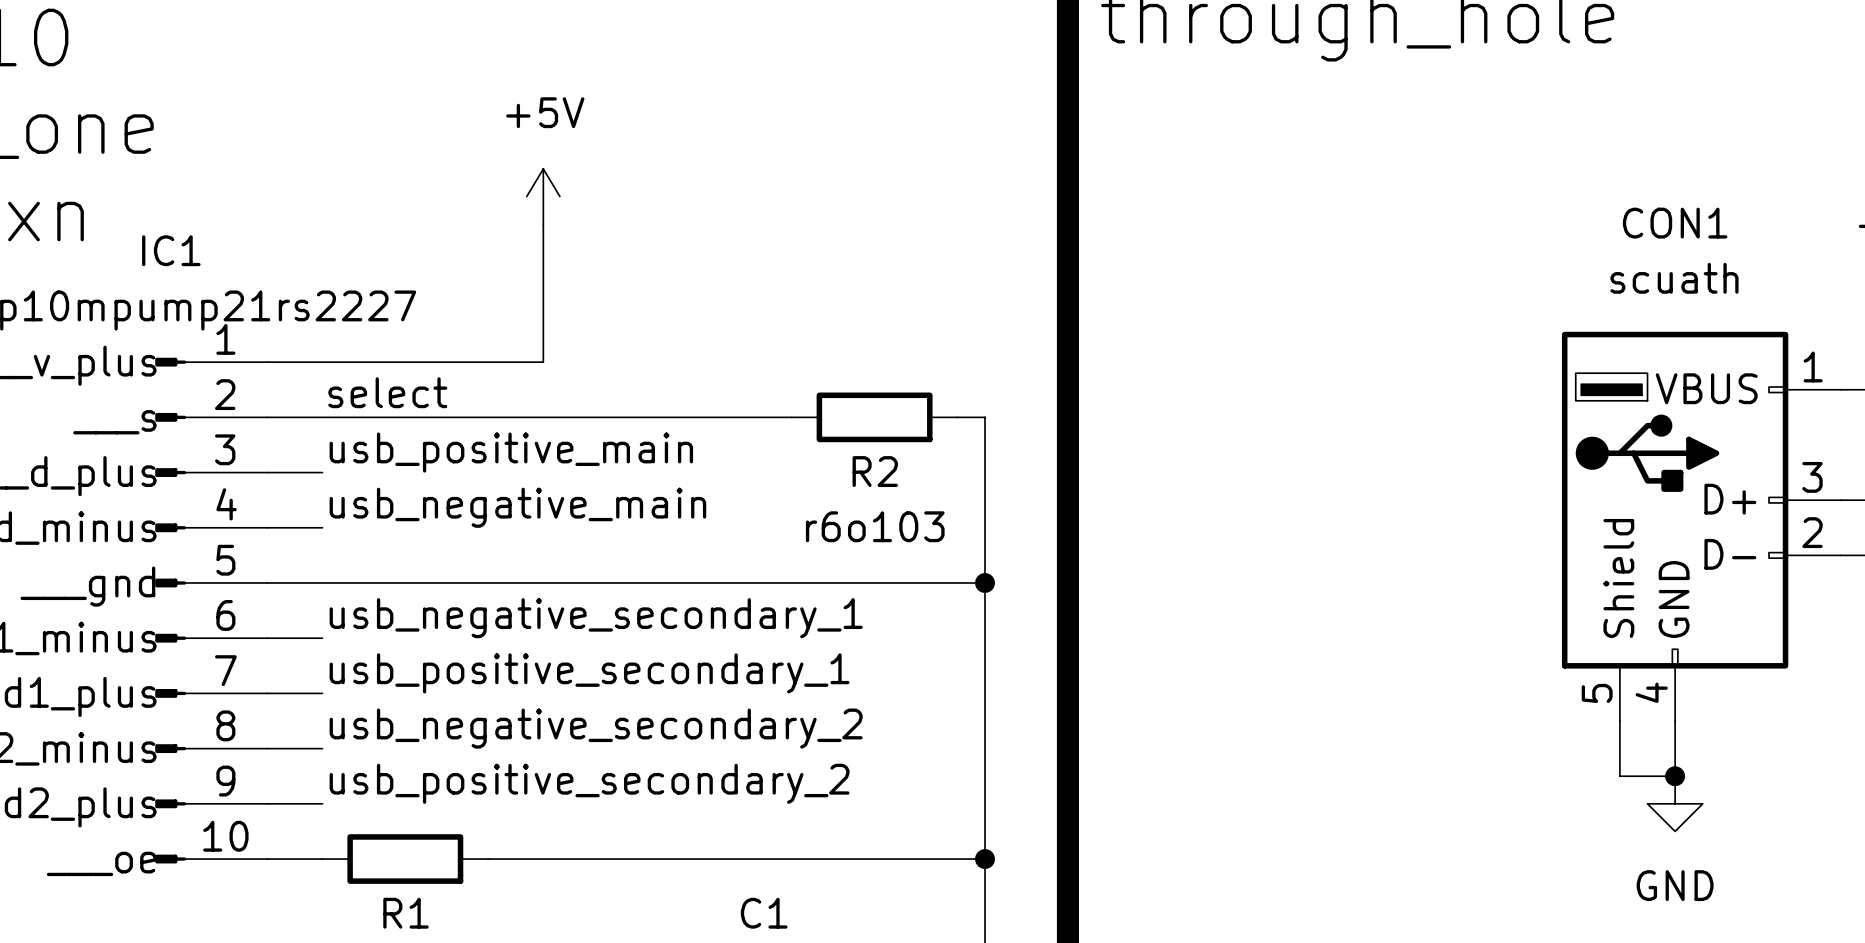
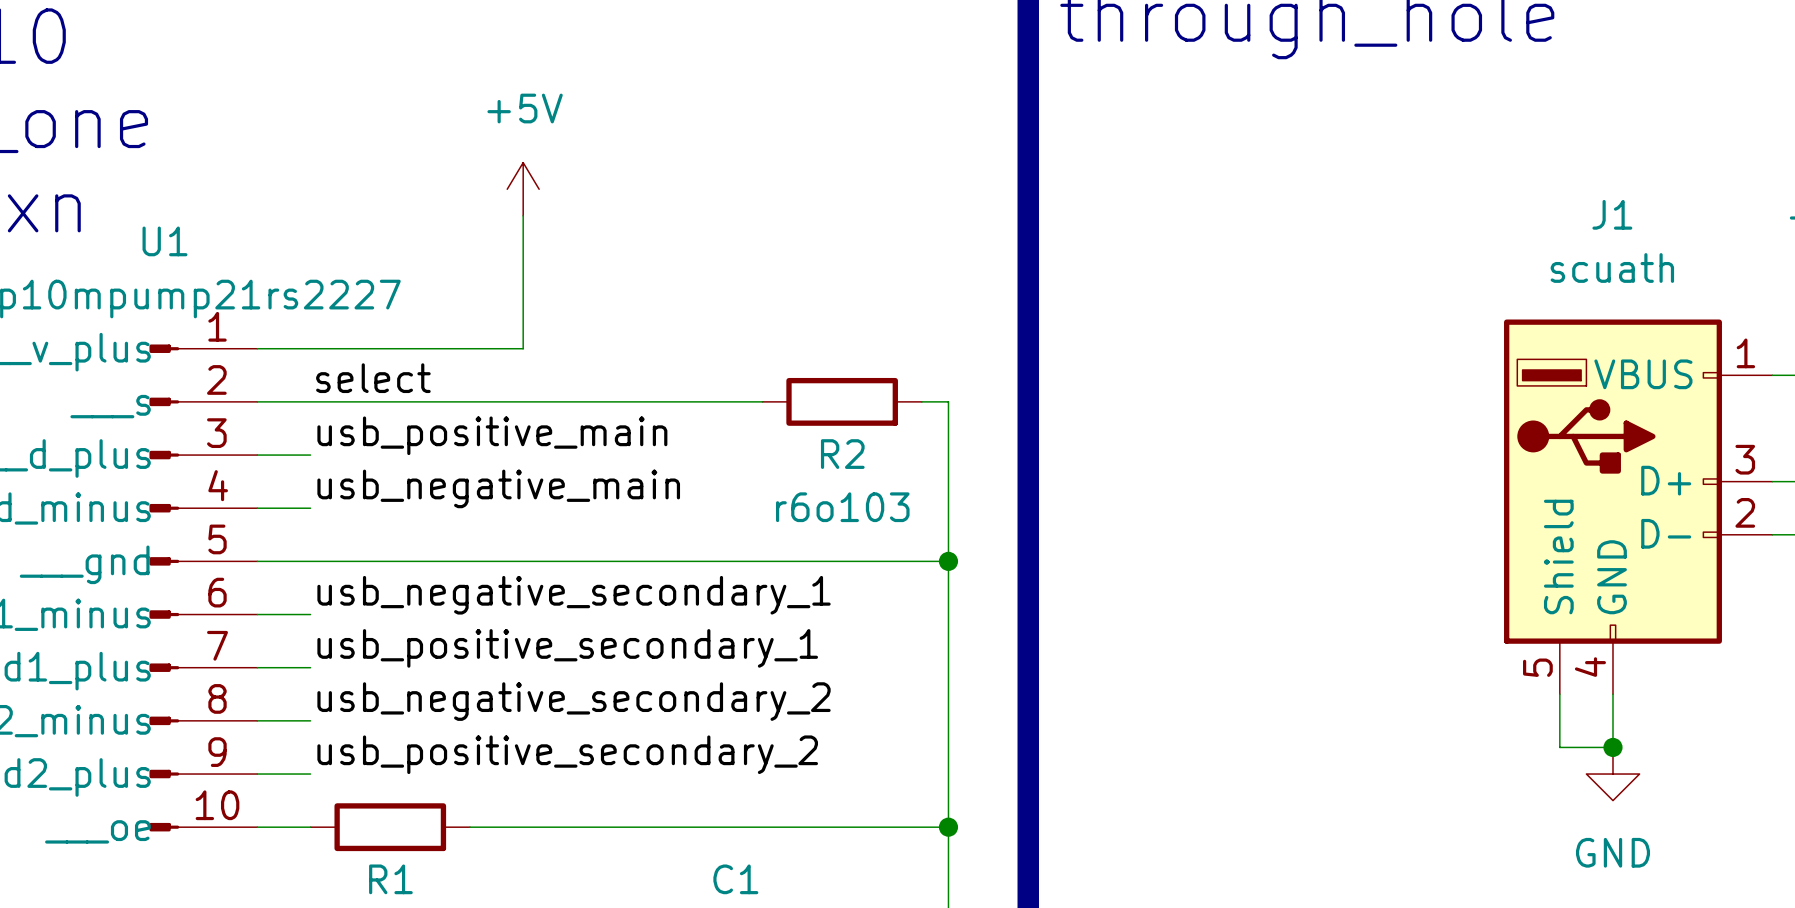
CON1 name: CON1 (1675, 223) -> J1 (1612, 214)
IC1 name: IC1 (171, 250) -> U1 (164, 241)

